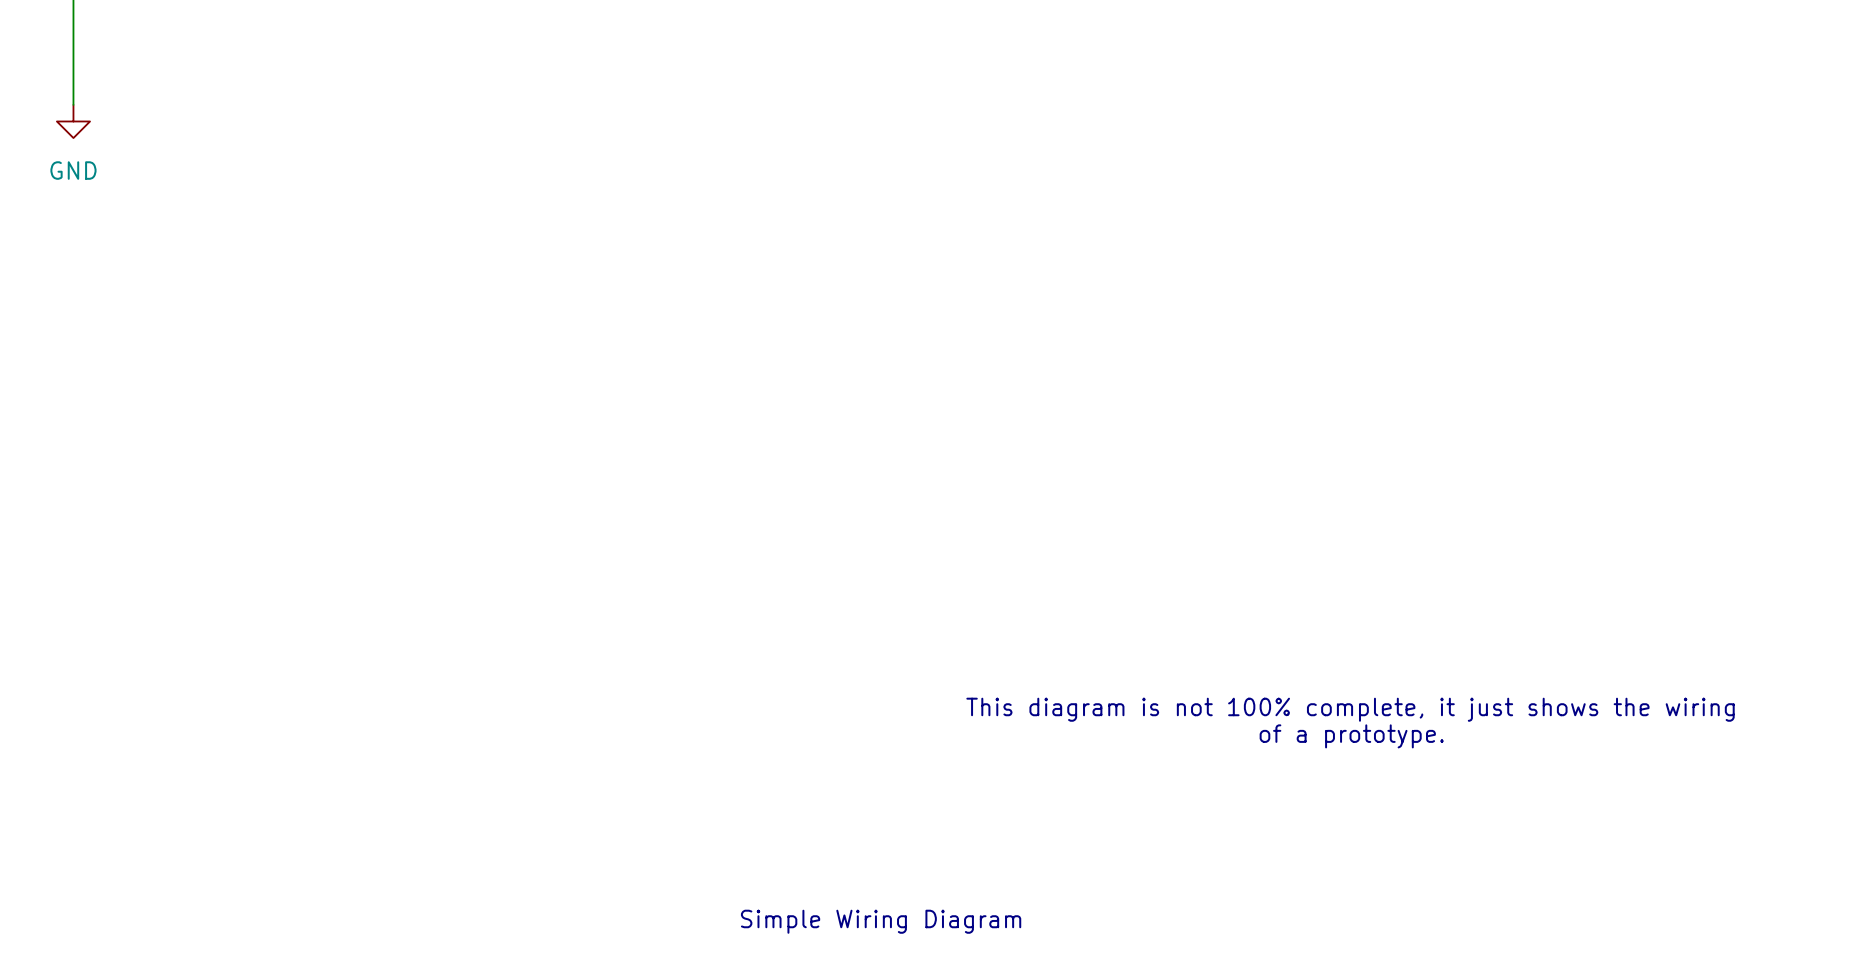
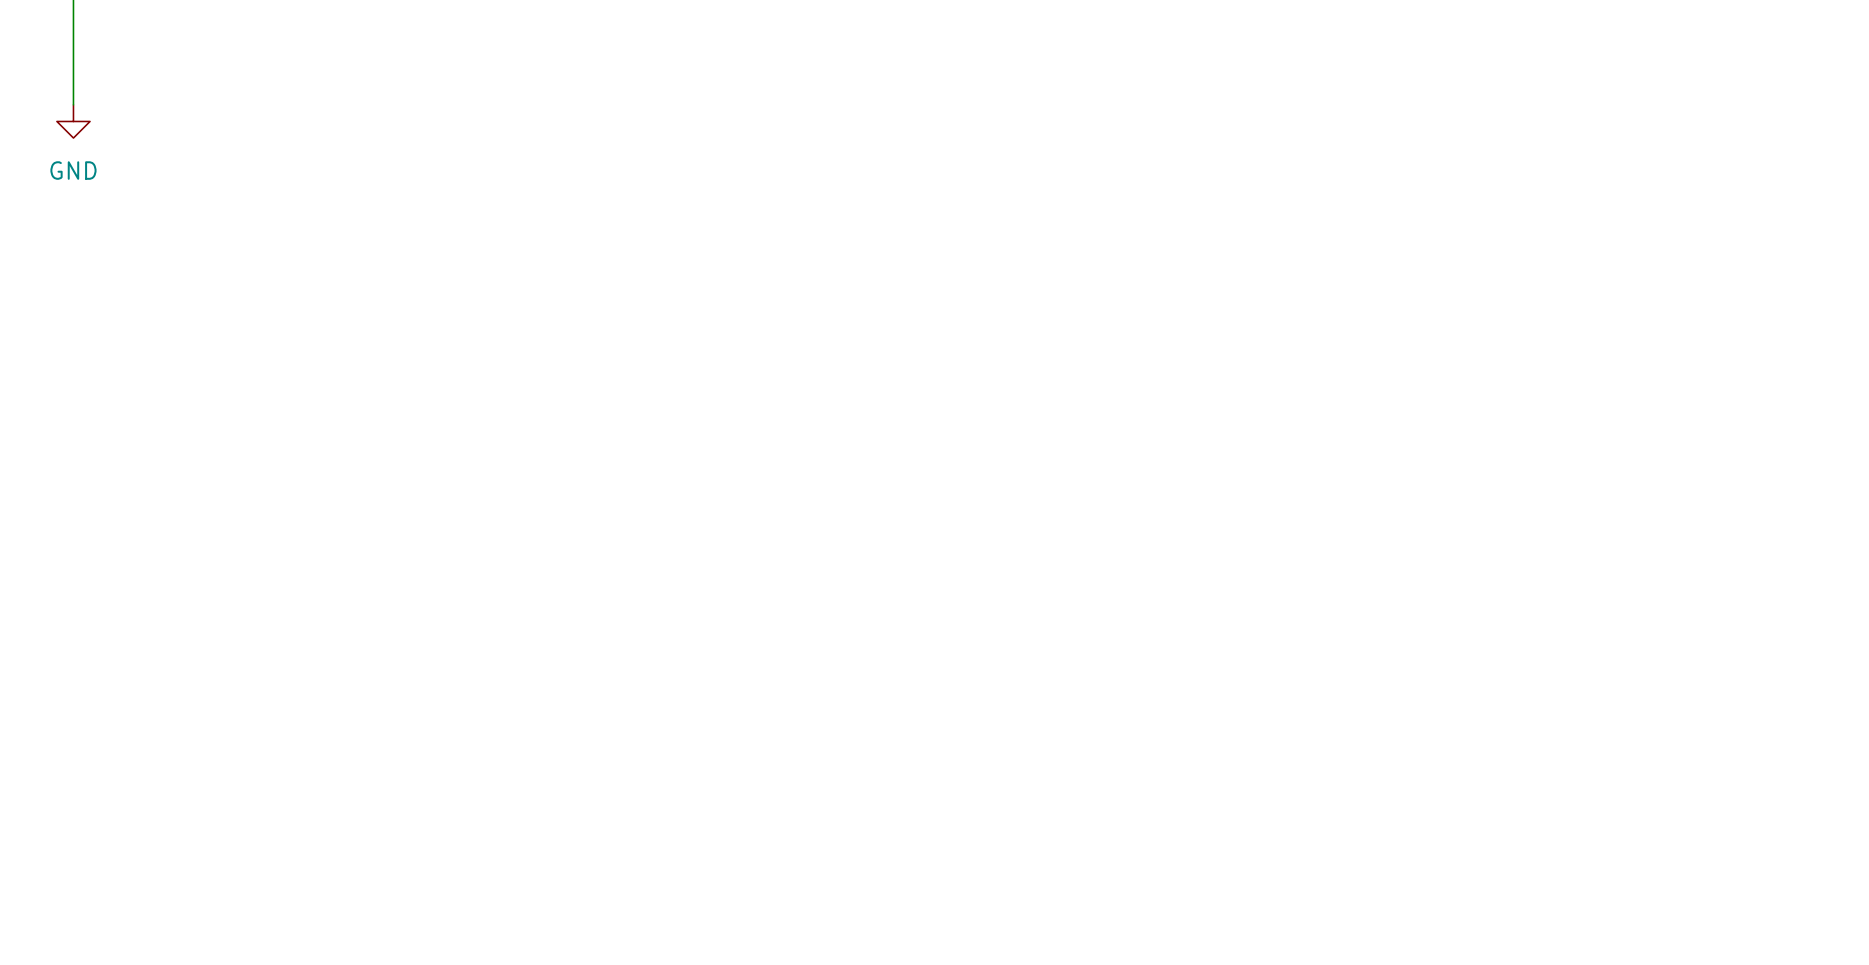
text: This diagram is not 100% complete, it just shows the wiring (1350, 709) -> none
text: of a prototype. (1351, 736) -> none
text: Simple Wiring Diagram (881, 921) -> none

